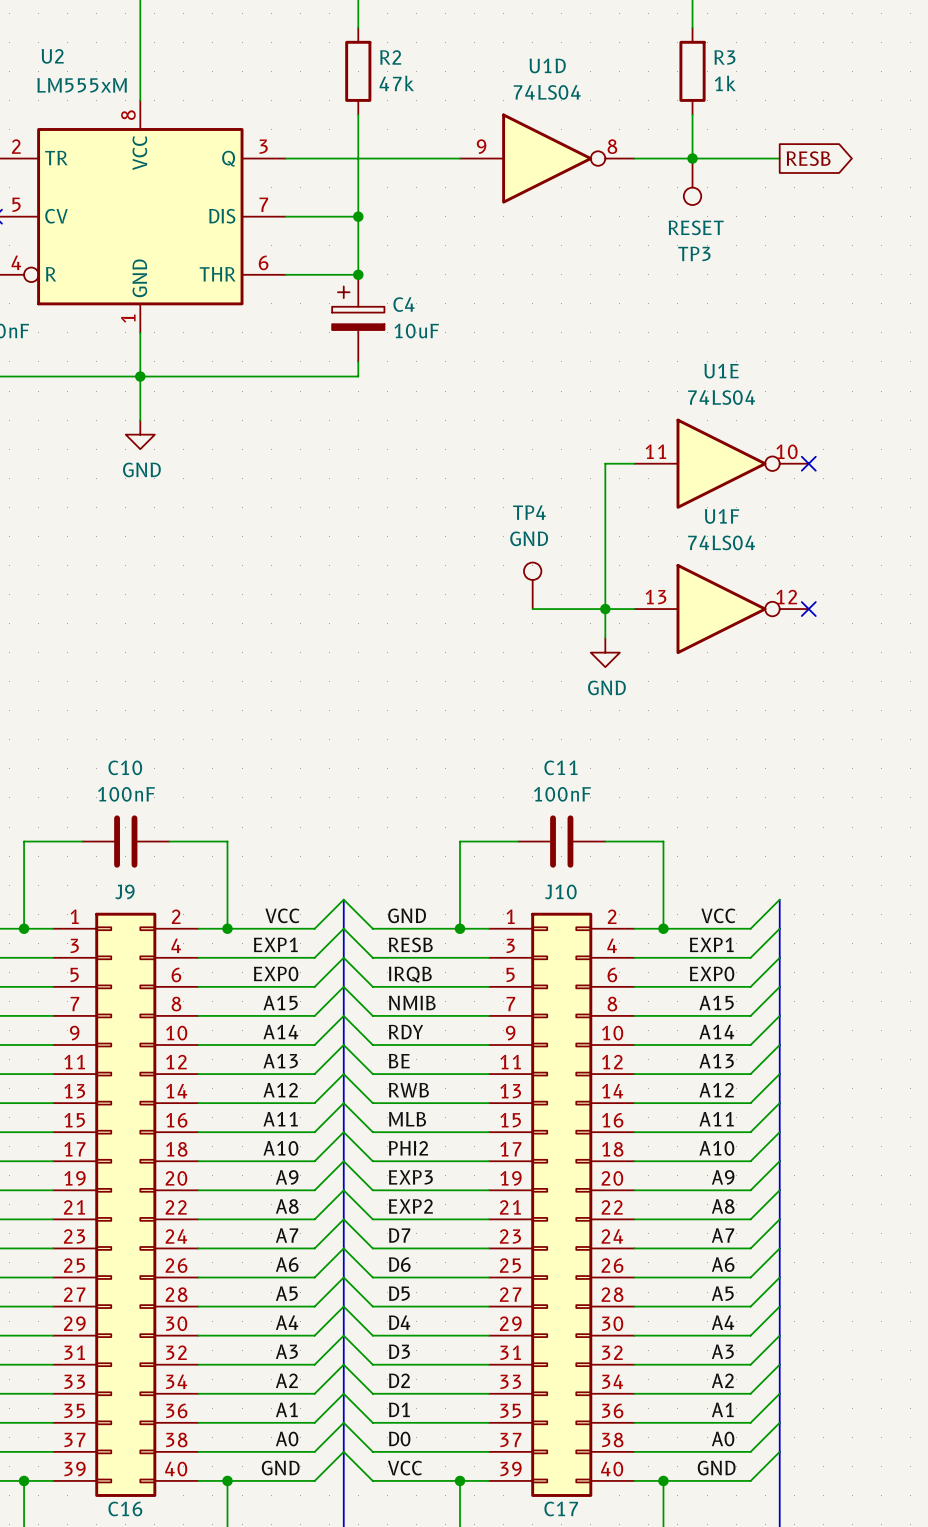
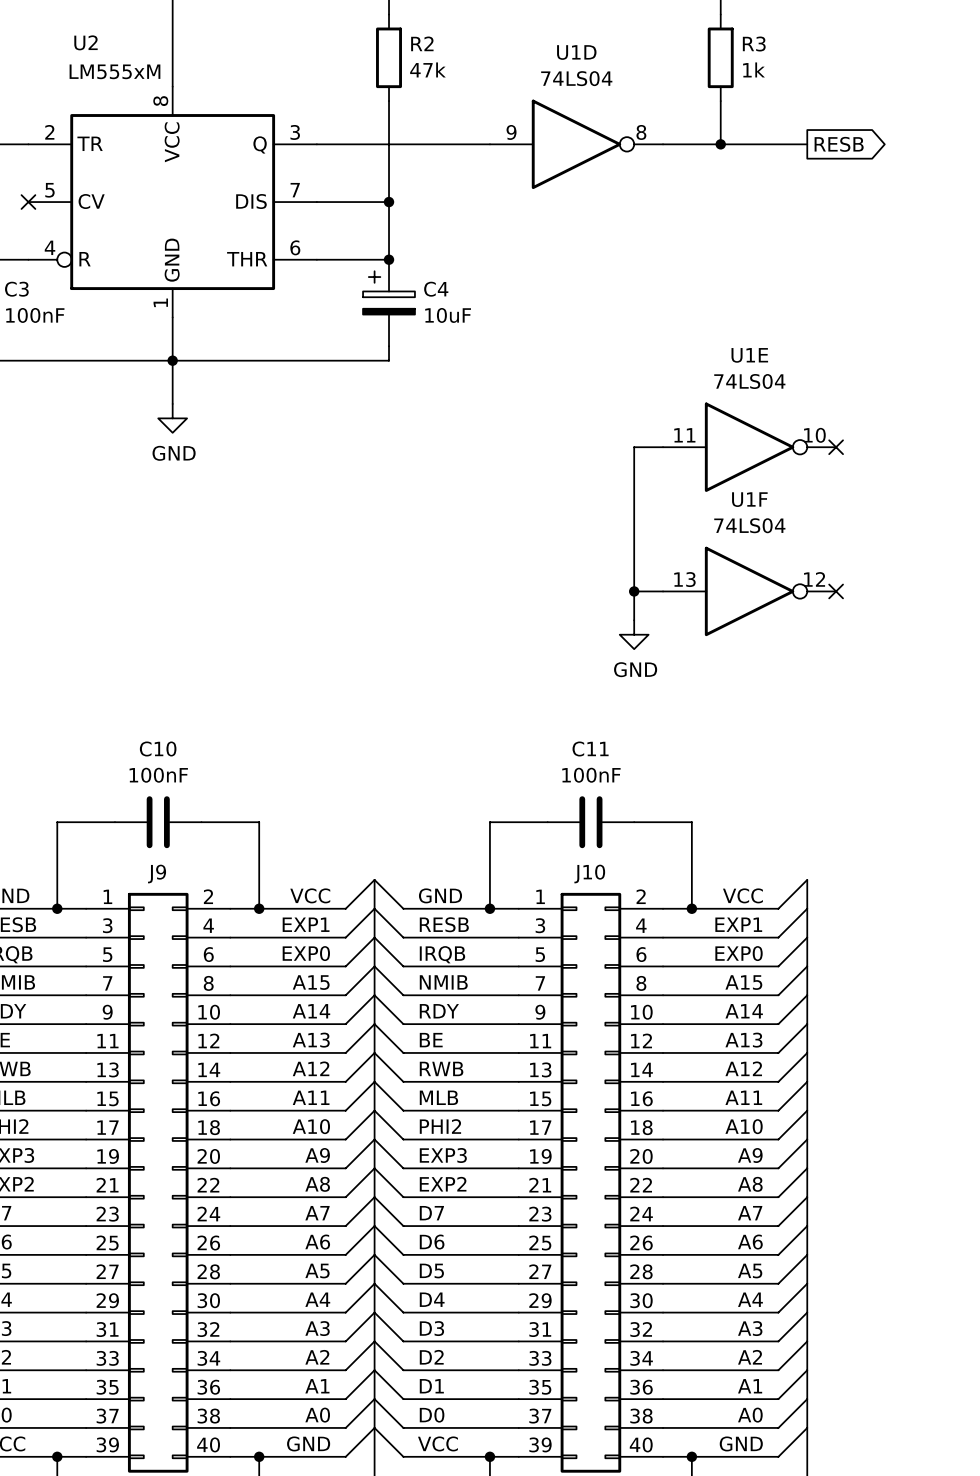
TP3: RESET (692, 181) -> none
TP4: GND (532, 585) -> none
wire: (532, 609) (605, 609) -> none

